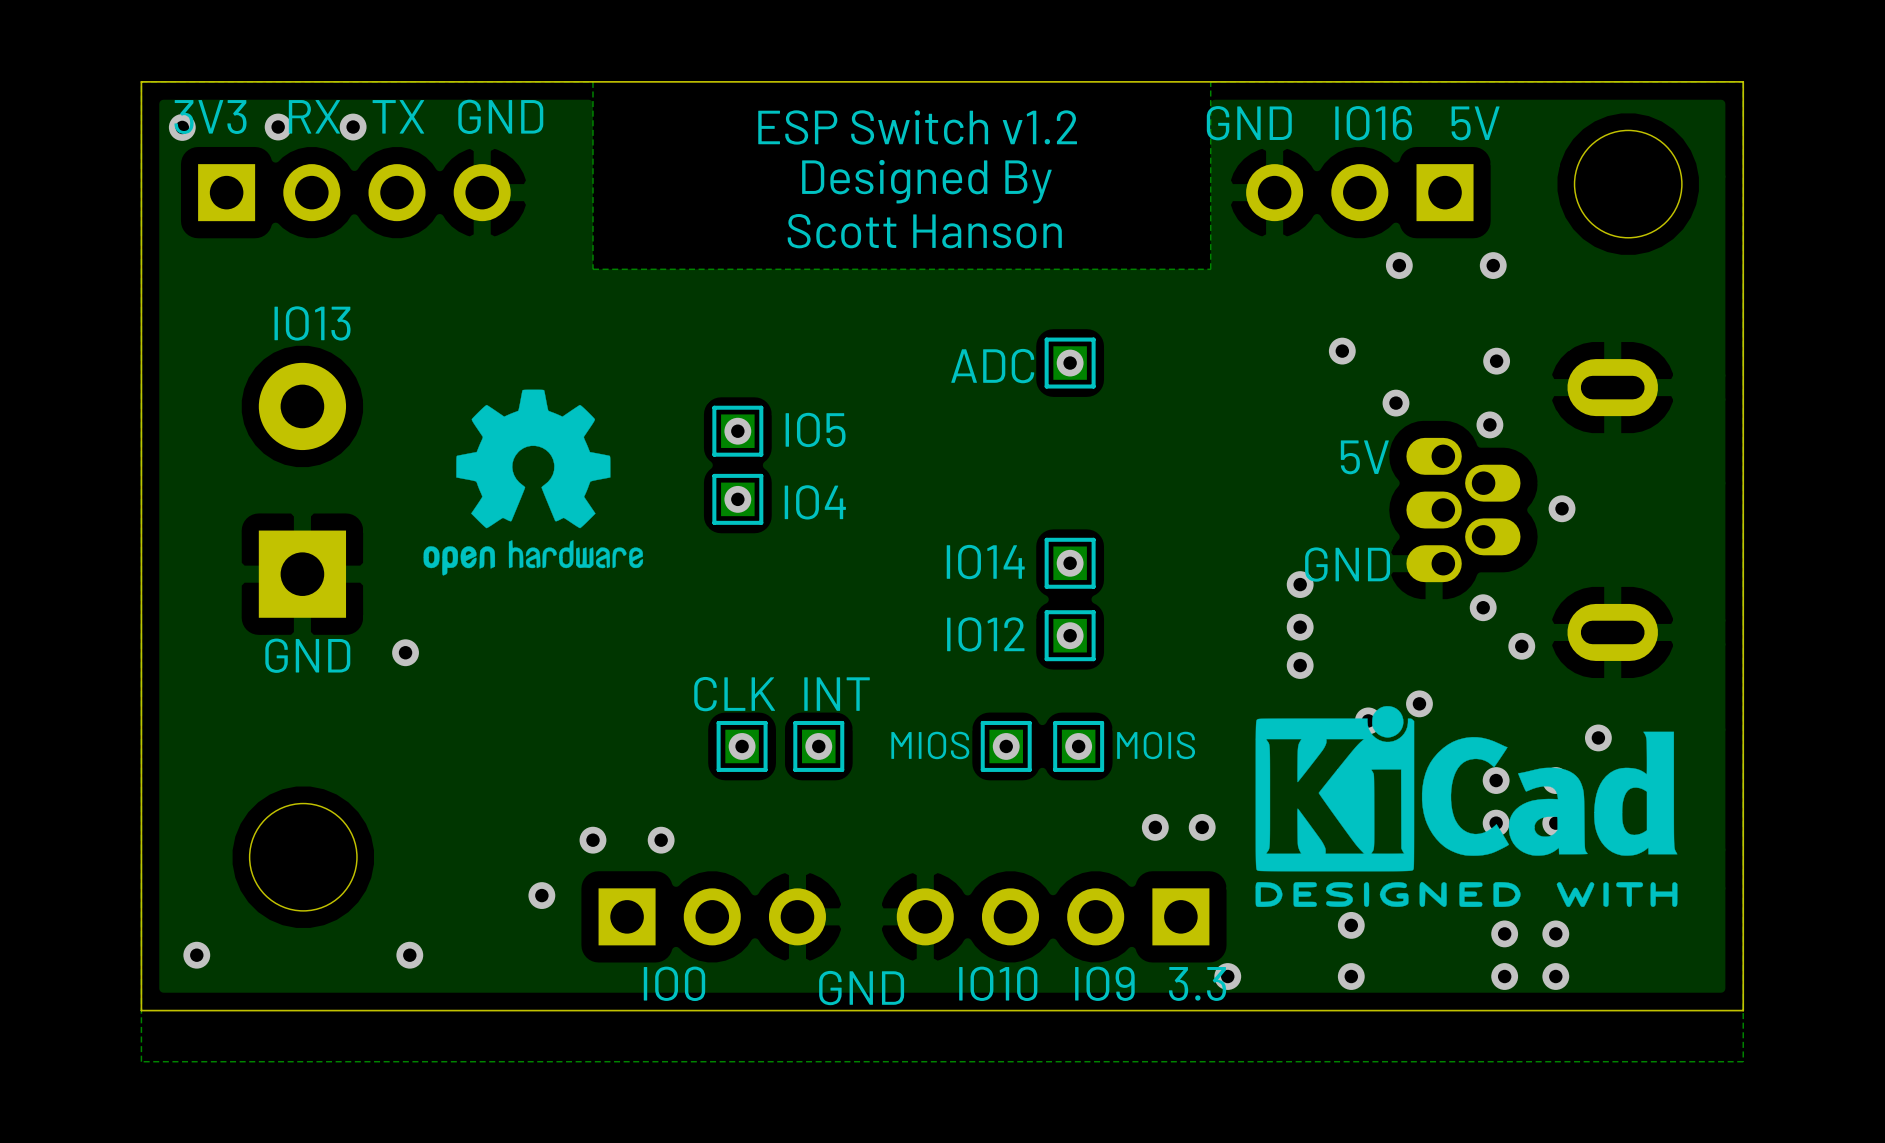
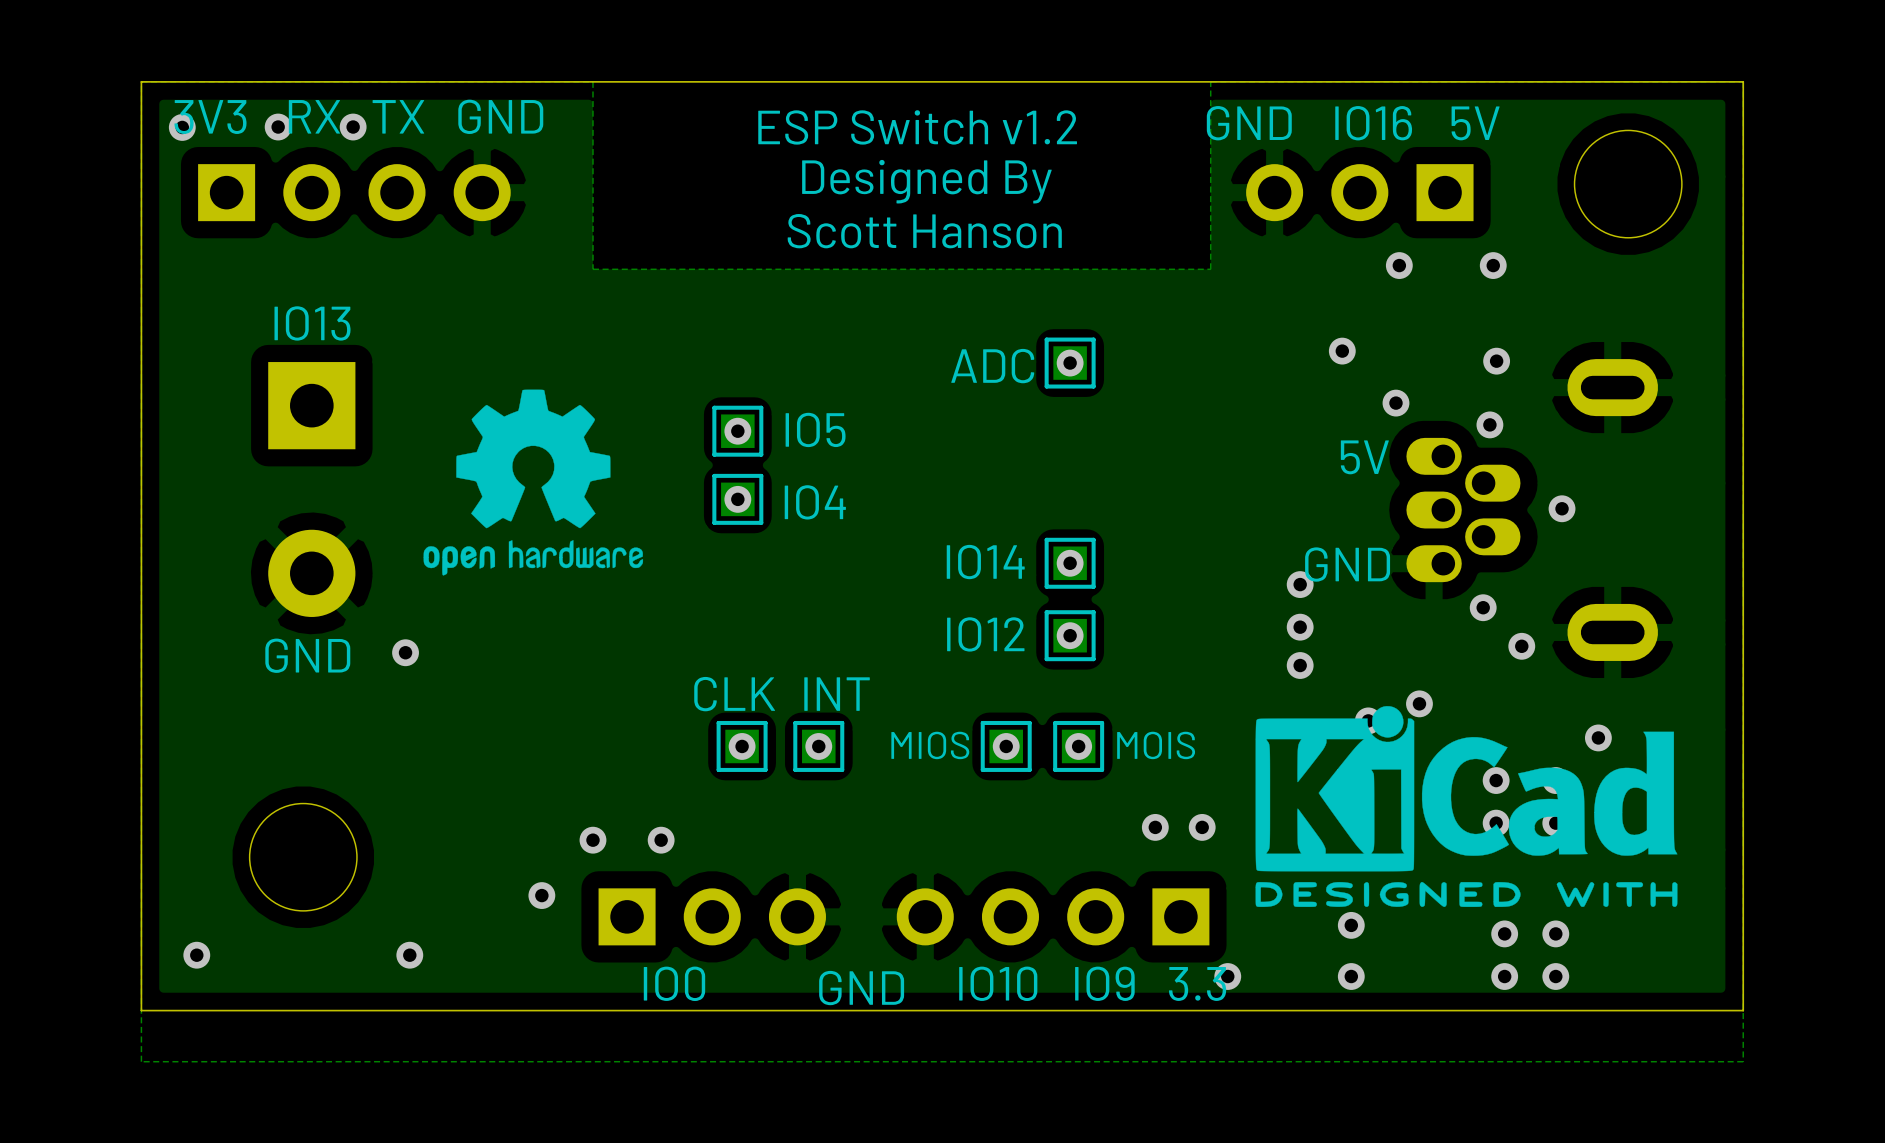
part rotation: 0° (302, 490) -> 180° (311, 489)

